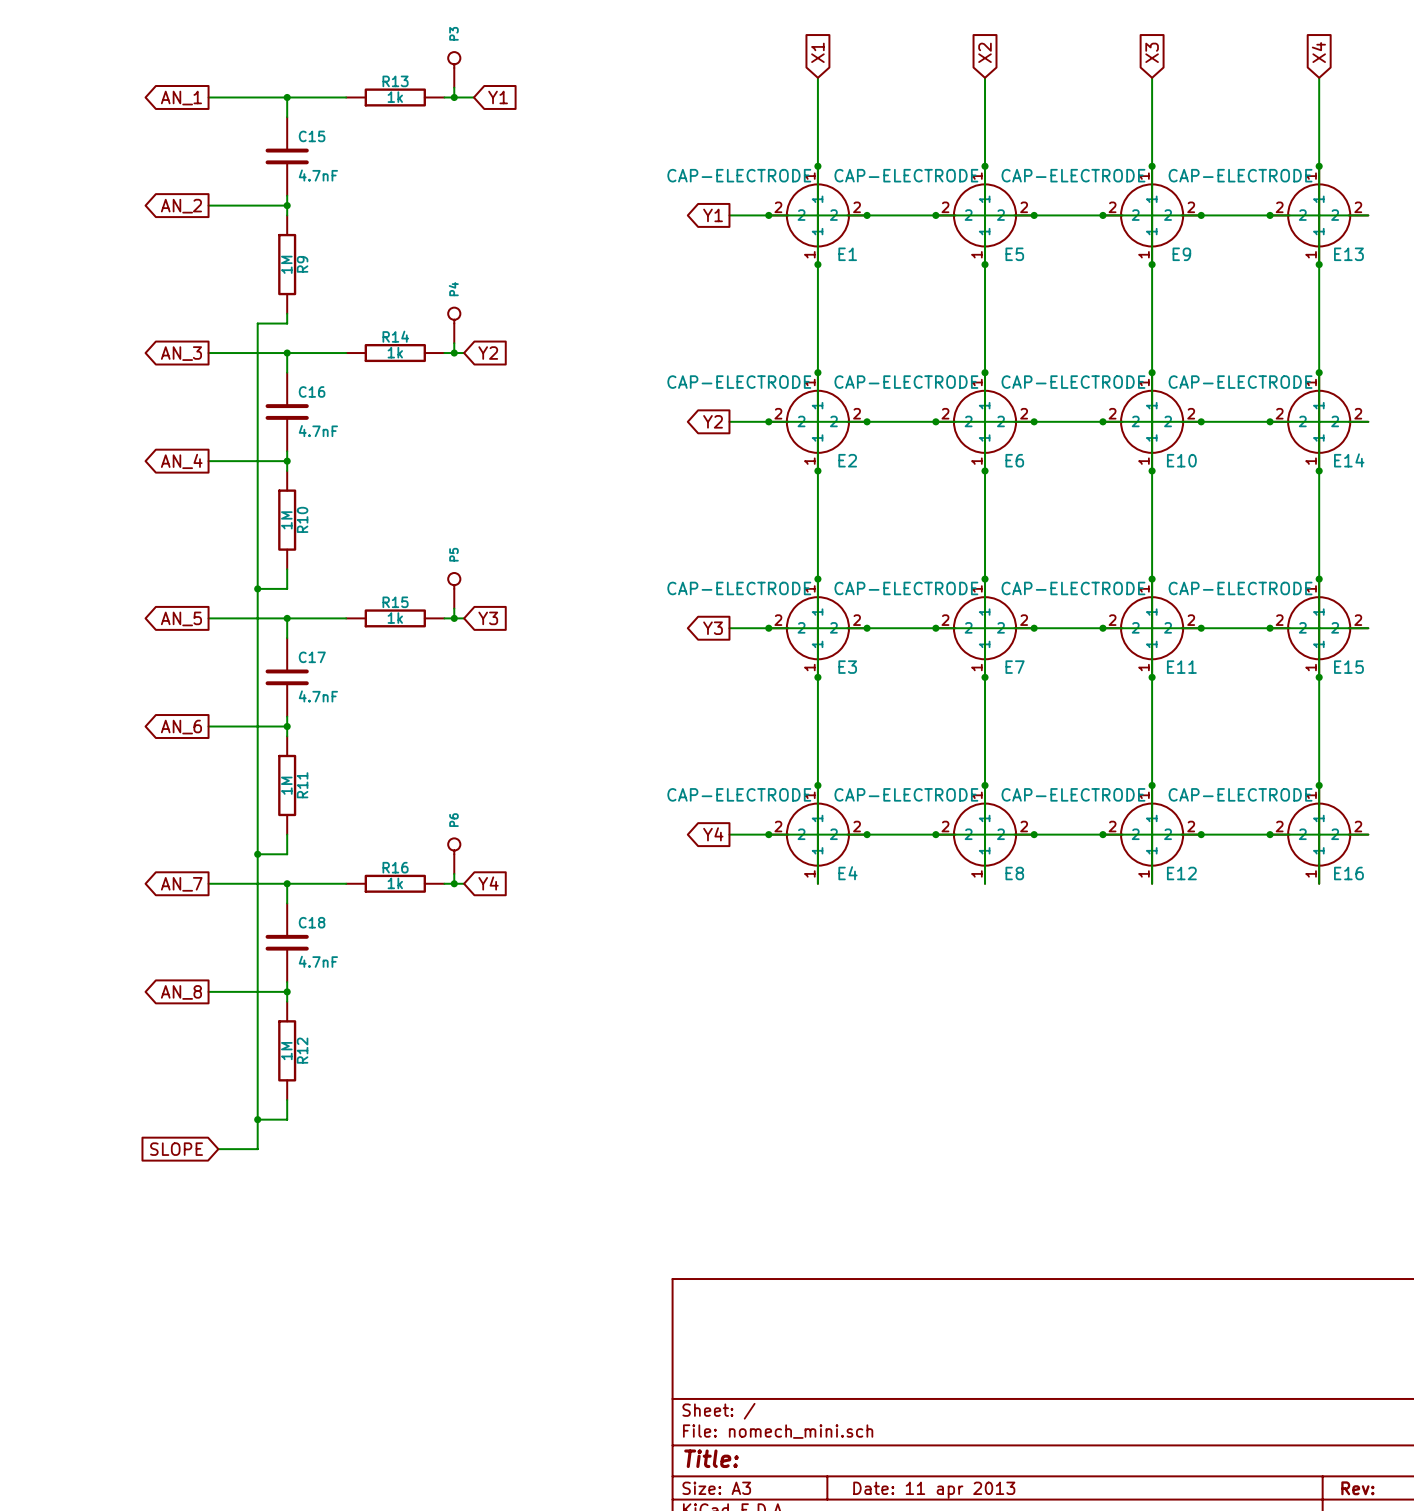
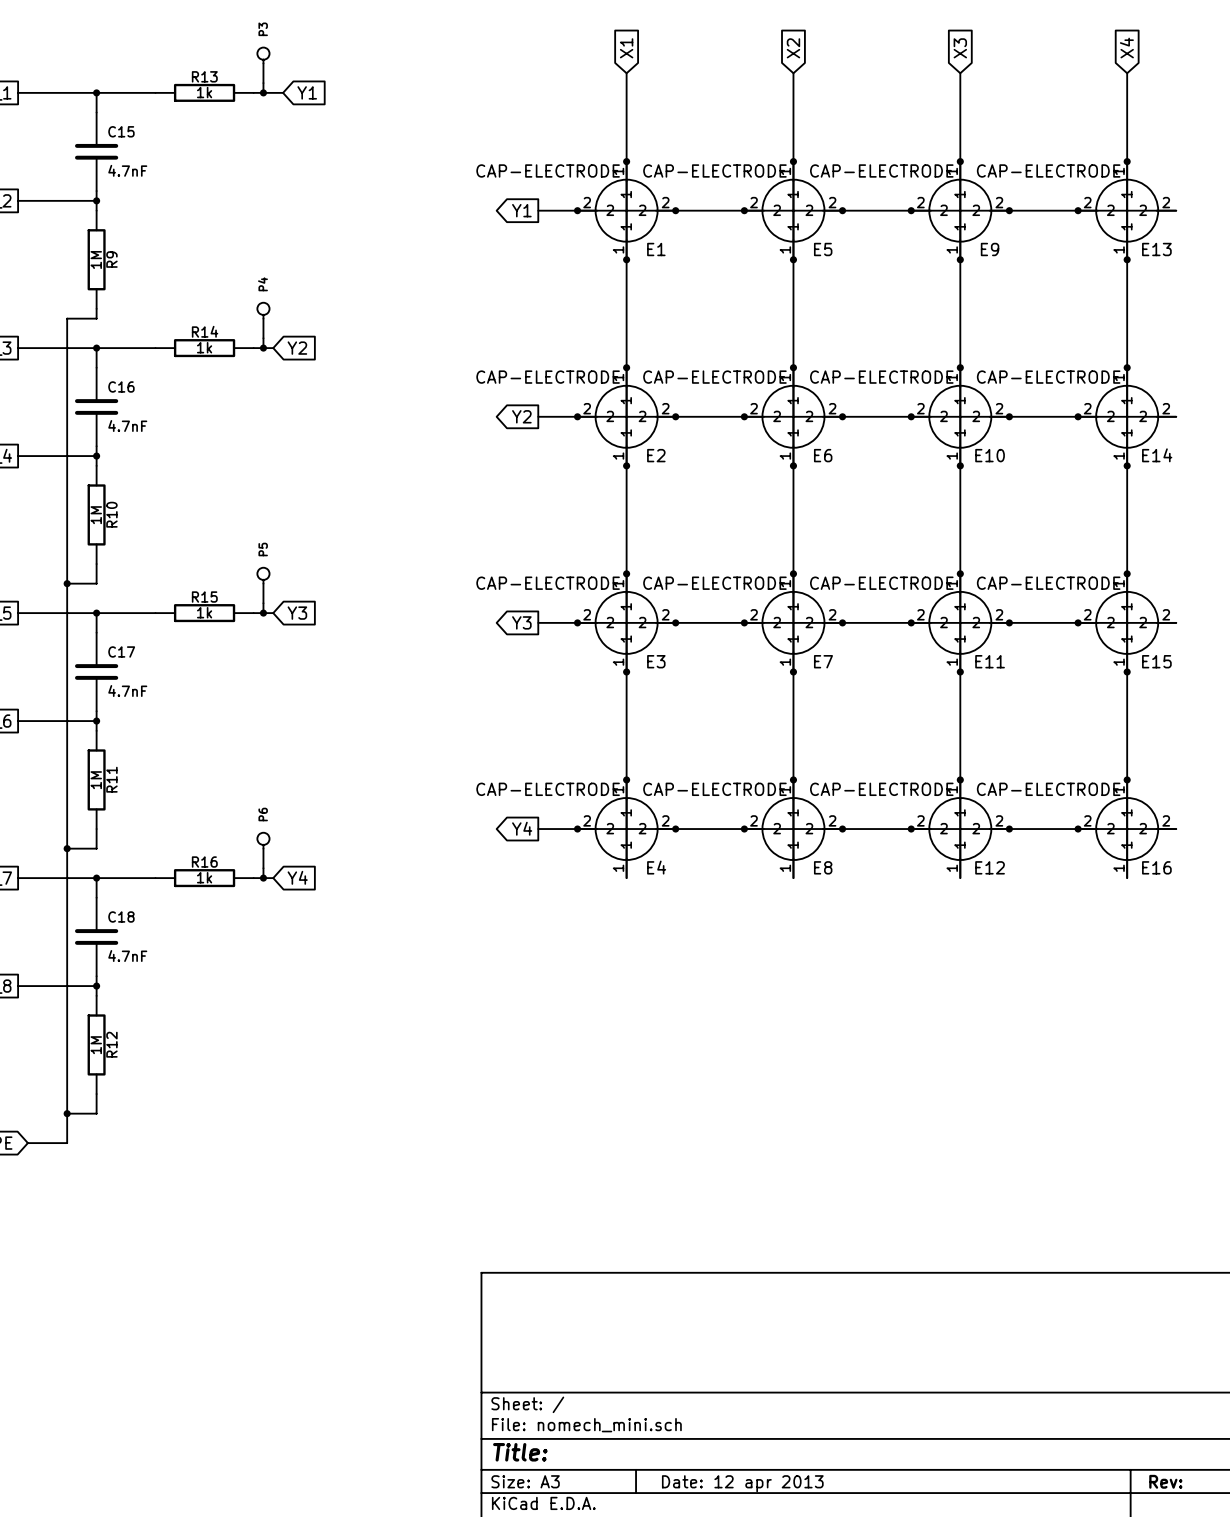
title block: Date: 11 apr 2013 (934, 1490) -> Date: 12 apr 2013 (742, 1483)

